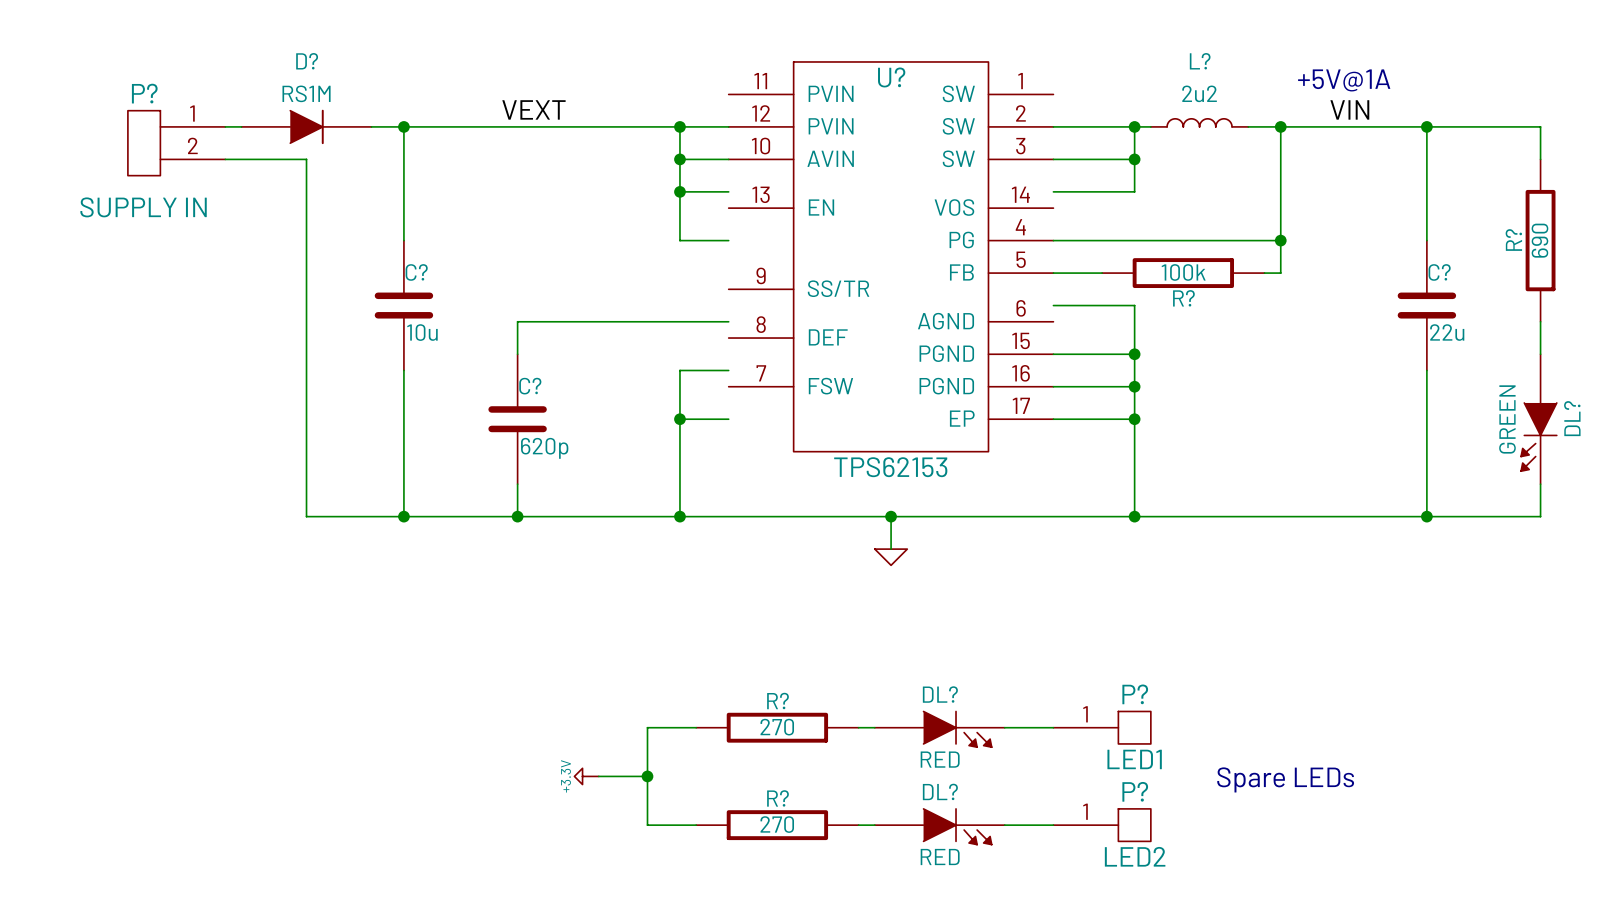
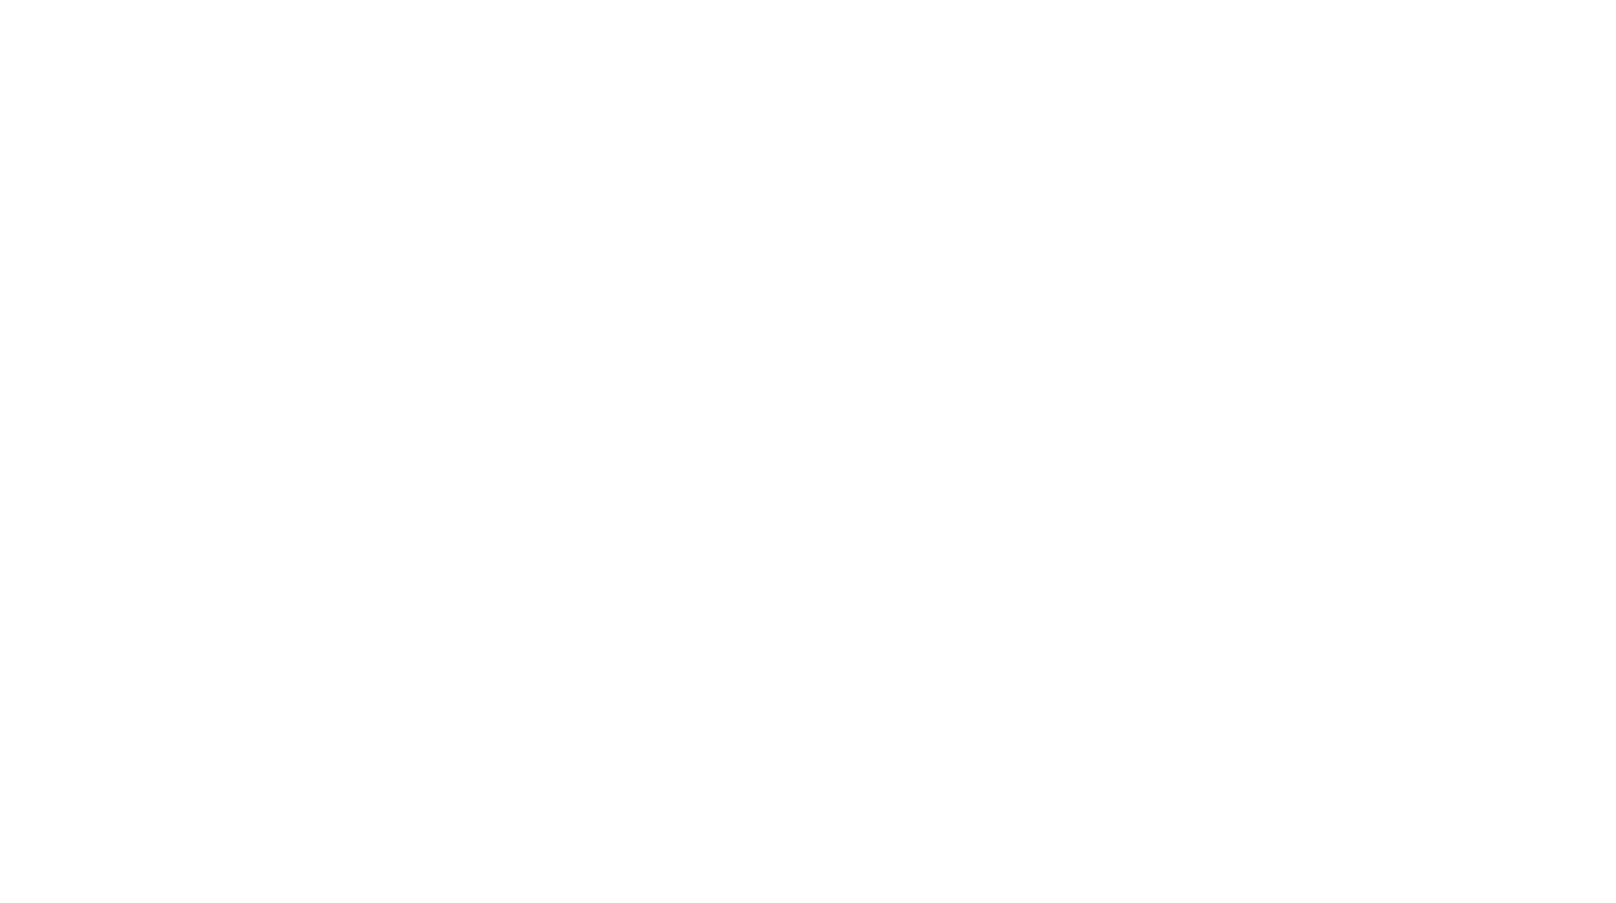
text: +5V@1A (1344, 80) -> none
label: VEXT (533, 109) -> none
label: VIN (1349, 109) -> none
L?: 2u2 (1199, 122) -> none
wire: (225, 126) (241, 126) -> none
D?: RS1M (306, 126) -> none
wire: (371, 126) (728, 126) -> none
wire: (403, 126) (403, 240) -> none
junction: (403, 126) -> none
wire: (679, 126) (679, 240) (728, 240) -> none
junction: (679, 126) -> none
wire: (1053, 126) (1150, 126) -> none
wire: (1134, 126) (1134, 191) (1053, 191) -> none
junction: (1134, 126) -> none
wire: (1248, 126) (1540, 126) (1540, 159) -> none
wire: (1280, 126) (1280, 273) (1264, 273) -> none
junction: (1280, 126) -> none
wire: (1426, 126) (1426, 240) -> none
junction: (1426, 126) -> none
P?: SUPPLY IN (176, 143) -> none
wire: (225, 159) (306, 159) (306, 516) (1540, 516) (1540, 484) -> none
wire: (679, 159) (728, 159) -> none
junction: (679, 159) -> none
wire: (1053, 159) (1134, 159) -> none
junction: (1134, 159) -> none
wire: (679, 191) (728, 191) -> none
junction: (679, 191) -> none
wire: (1053, 240) (1280, 240) -> none
junction: (1280, 240) -> none
R?: 690 (1540, 240) -> none
U?: TPS62153 (891, 256) -> none
wire: (1053, 273) (1102, 273) -> none
R?: 100k (1183, 273) -> none
C?: 10u (403, 305) -> none
wire: (1053, 305) (1134, 305) (1134, 516) -> none
C?: 22u (1426, 305) -> none
wire: (728, 321) (517, 321) (517, 354) -> none
wire: (1540, 321) (1540, 354) -> none
wire: (1053, 354) (1134, 354) -> none
junction: (1134, 354) -> none
wire: (403, 370) (403, 516) -> none
wire: (728, 370) (679, 370) (679, 516) -> none
wire: (1426, 370) (1426, 516) -> none
wire: (1053, 386) (1134, 386) -> none
junction: (1134, 386) -> none
C?: 620p (517, 419) -> none
wire: (679, 419) (728, 419) -> none
junction: (679, 419) -> none
wire: (1053, 419) (1134, 419) -> none
junction: (1134, 419) -> none
DL?: GREEN (1538, 419) -> none
wire: (517, 484) (517, 516) -> none
junction: (403, 516) -> none
junction: (517, 516) -> none
junction: (679, 516) -> none
wire: (891, 516) (891, 549) -> none
junction: (891, 516) -> none
junction: (1134, 516) -> none
junction: (1426, 516) -> none
power symbol: (891, 557) -> none
wire: (696, 727) (647, 727) (647, 825) (696, 825) -> none
R?: 270 (777, 727) -> none
wire: (858, 727) (874, 727) -> none
wire: (1004, 727) (1053, 727) -> none
P?: LED1 (1102, 727) -> none
DL?: RED (939, 729) -> none
power symbol: +3.3V (586, 776) -> none
wire: (598, 776) (647, 776) -> none
junction: (647, 776) -> none
text: Spare LEDs (1285, 779) -> none
R?: 270 (777, 825) -> none
wire: (858, 825) (874, 825) -> none
wire: (1004, 825) (1053, 825) -> none
P?: LED2 (1102, 825) -> none
DL?: RED (939, 826) -> none

